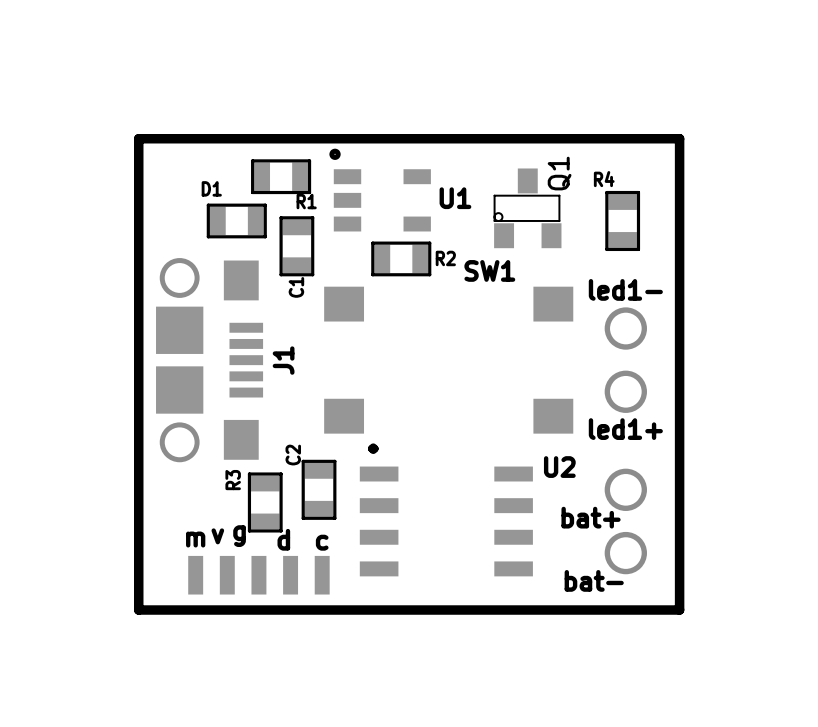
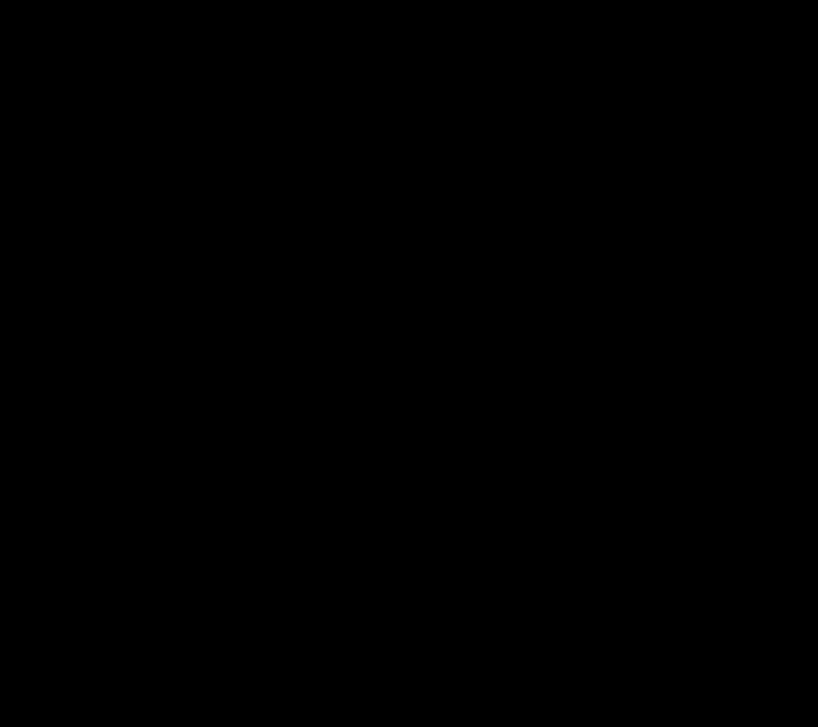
board edge: (138, 138) (679, 138) (679, 610) (138, 610) (138, 138) -> none
R1: (281, 176) -> none
U1: (380, 190) -> none
Q1: (527, 208) -> none
D1: (236, 220) -> none
R4: (622, 220) -> none
C1: (296, 246) -> none
R2: (401, 258) -> none
part: led1- (625, 328) -> none
J1: (209, 360) -> none
SW1: (448, 360) -> none
part: led1+ (625, 391) -> none
C2: (319, 489) -> none
part: bat+ (625, 489) -> none
R3: (265, 502) -> none
U2: (446, 521) -> none
part: bat- (625, 553) -> none
part: m (195, 575) -> none
part: v (227, 575) -> none
part: g (258, 575) -> none
part: d (290, 575) -> none
part: c (322, 575) -> none

